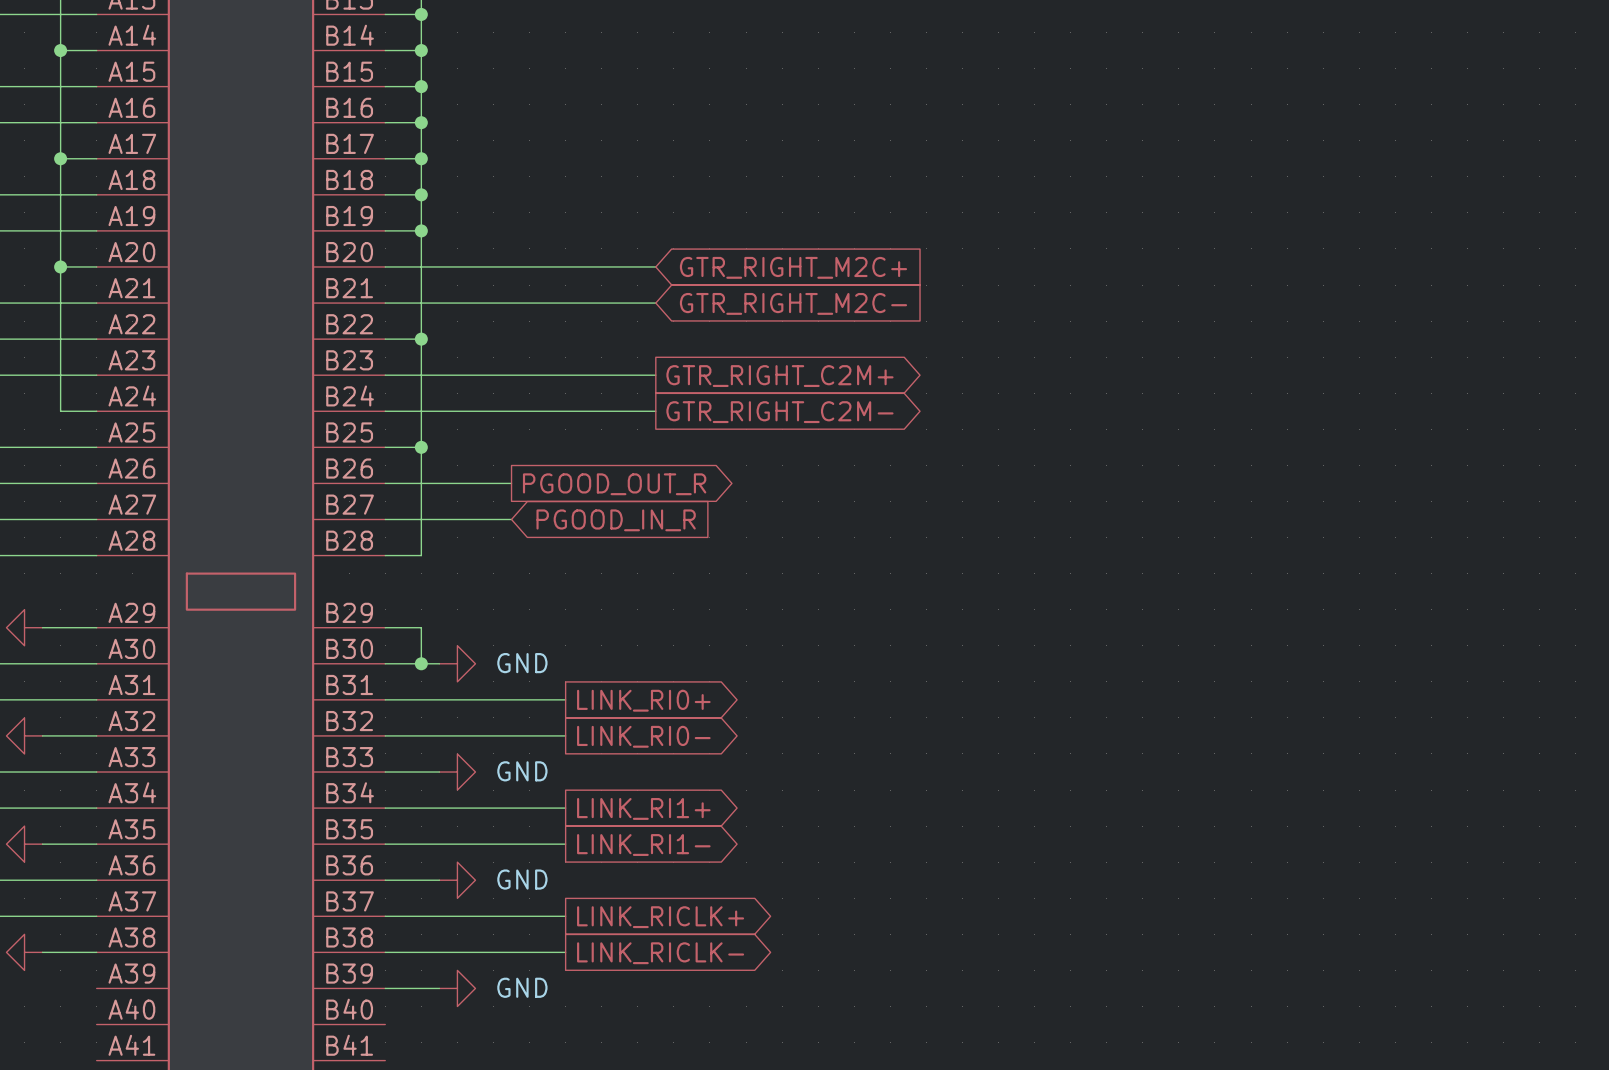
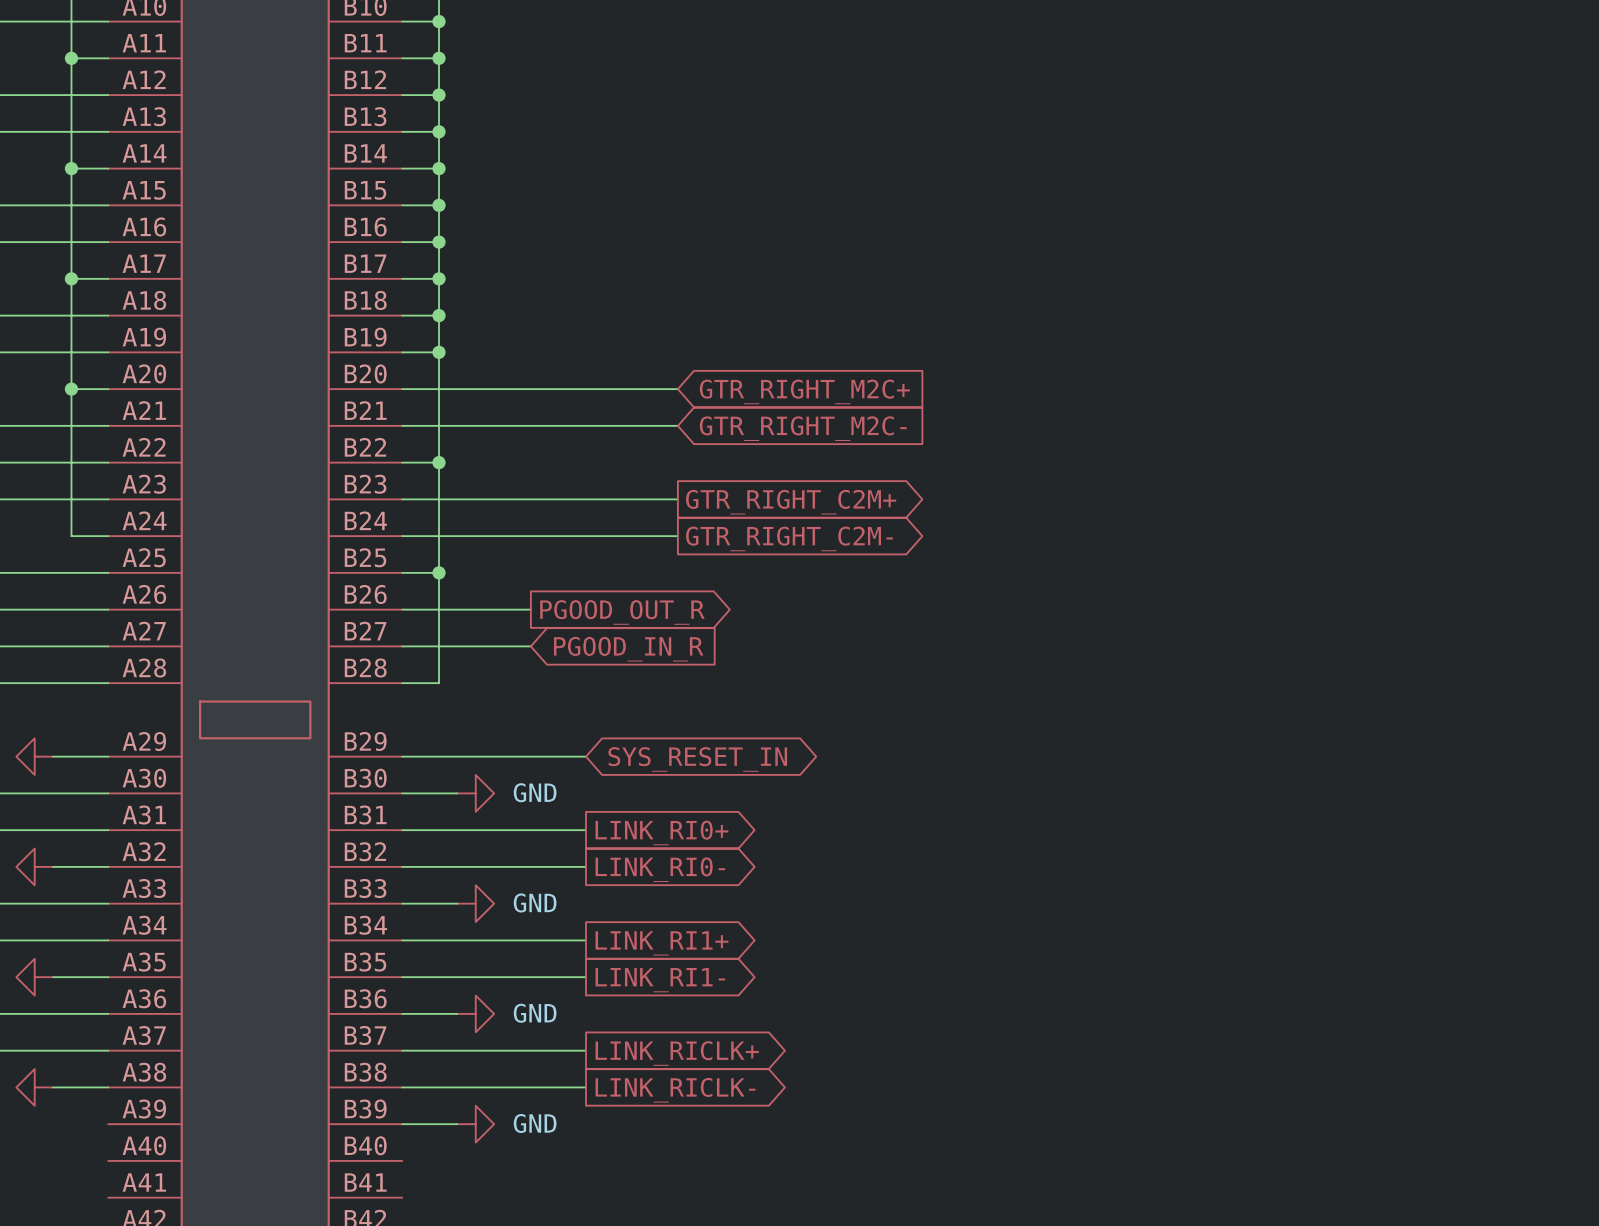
wire: (421, 627) (421, 663) -> (439, 756) (586, 756)
global label: none -> SYS_RESET_IN (697, 759)
junction: (421, 663) -> none

